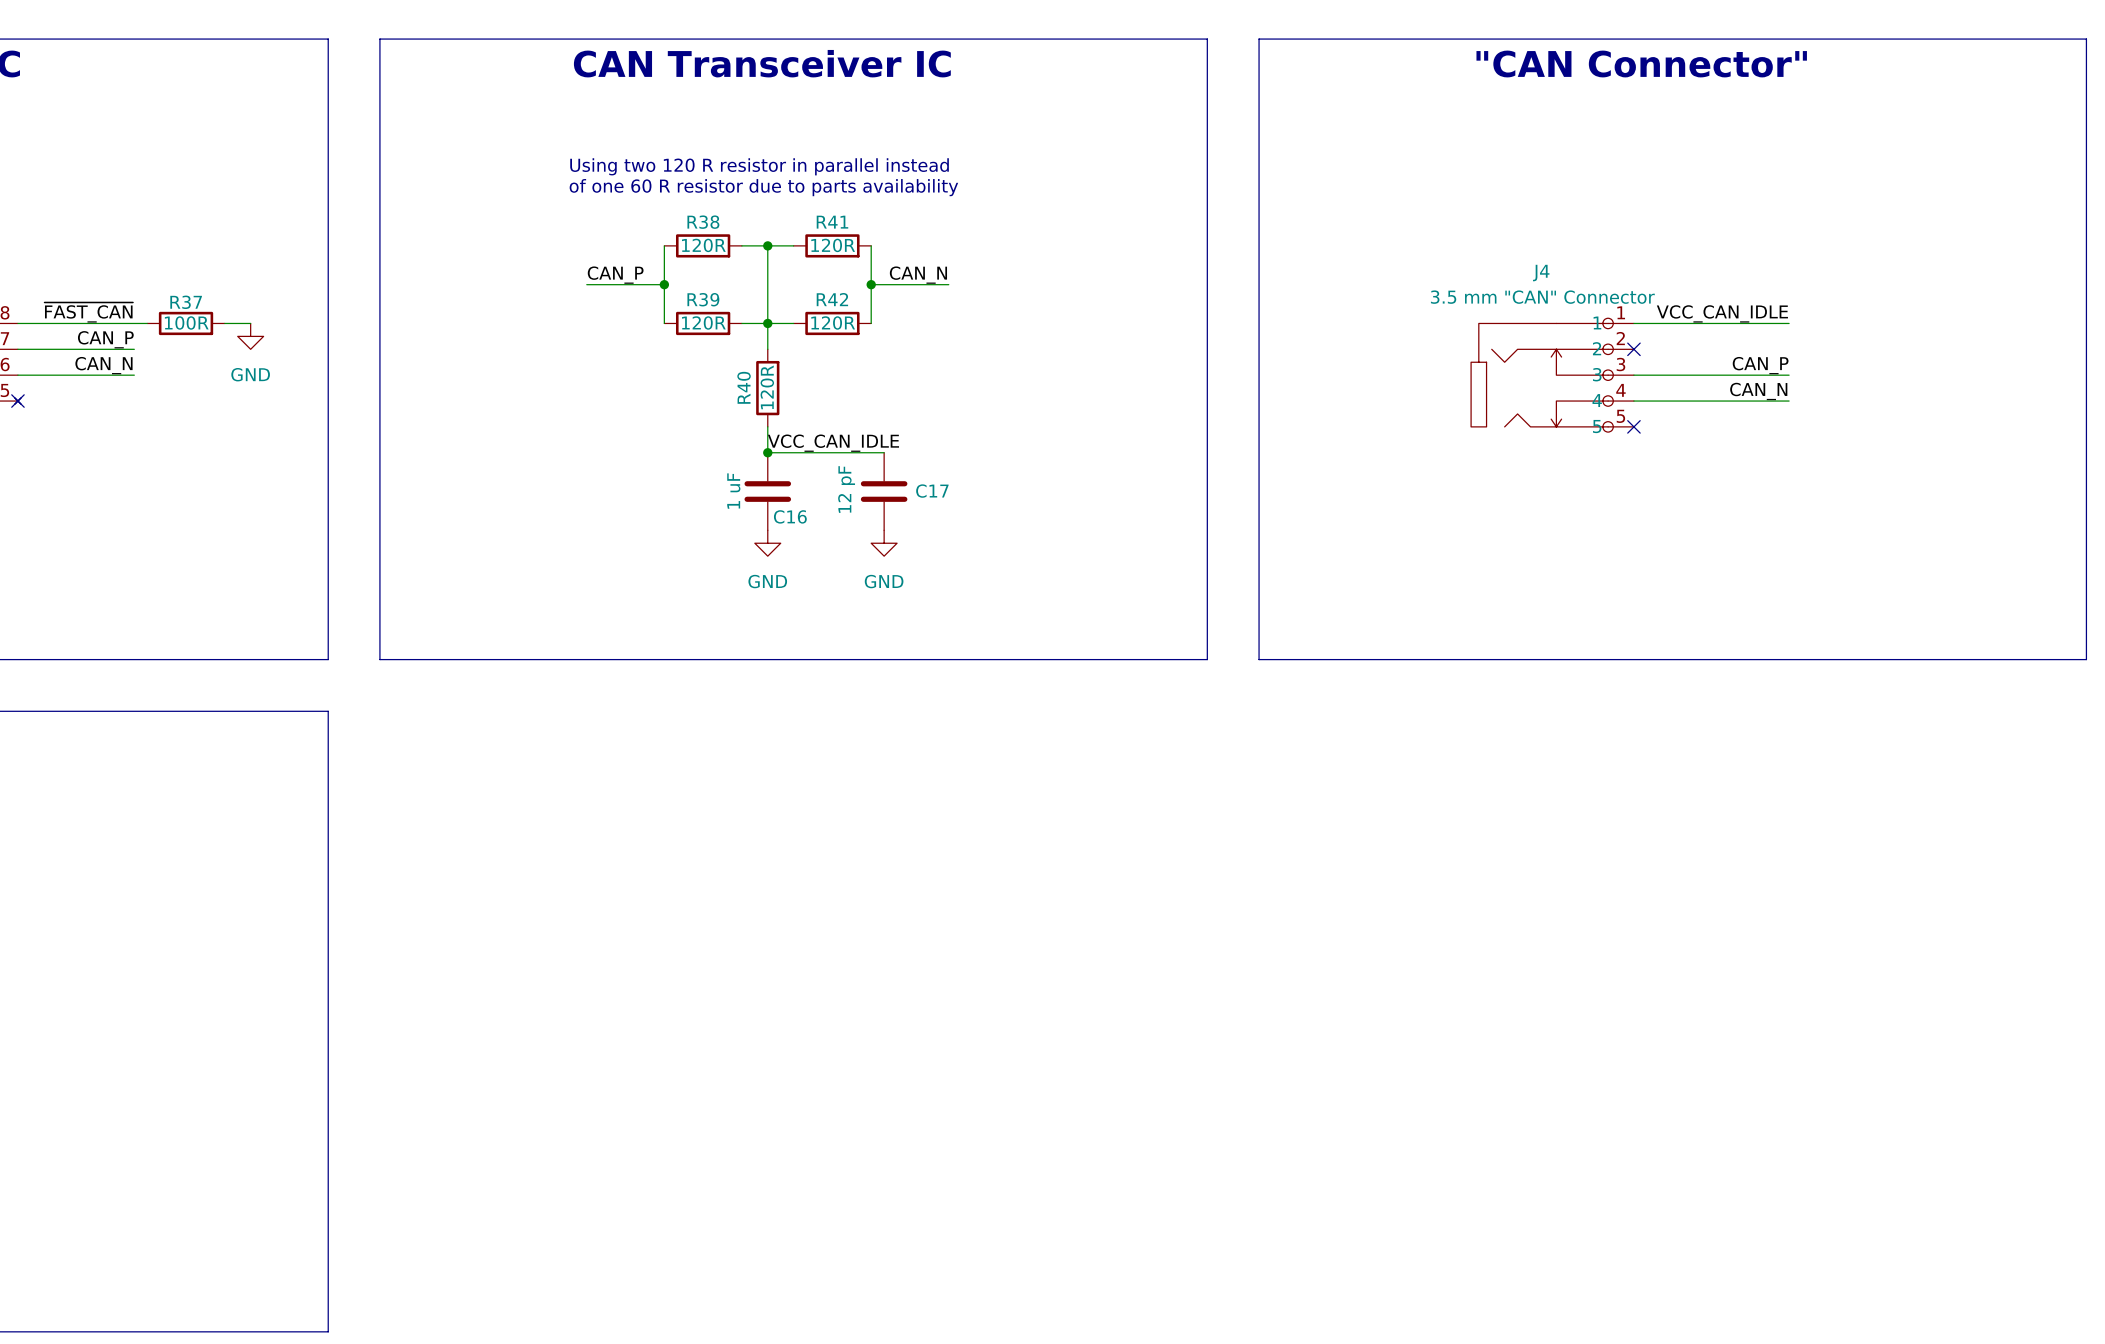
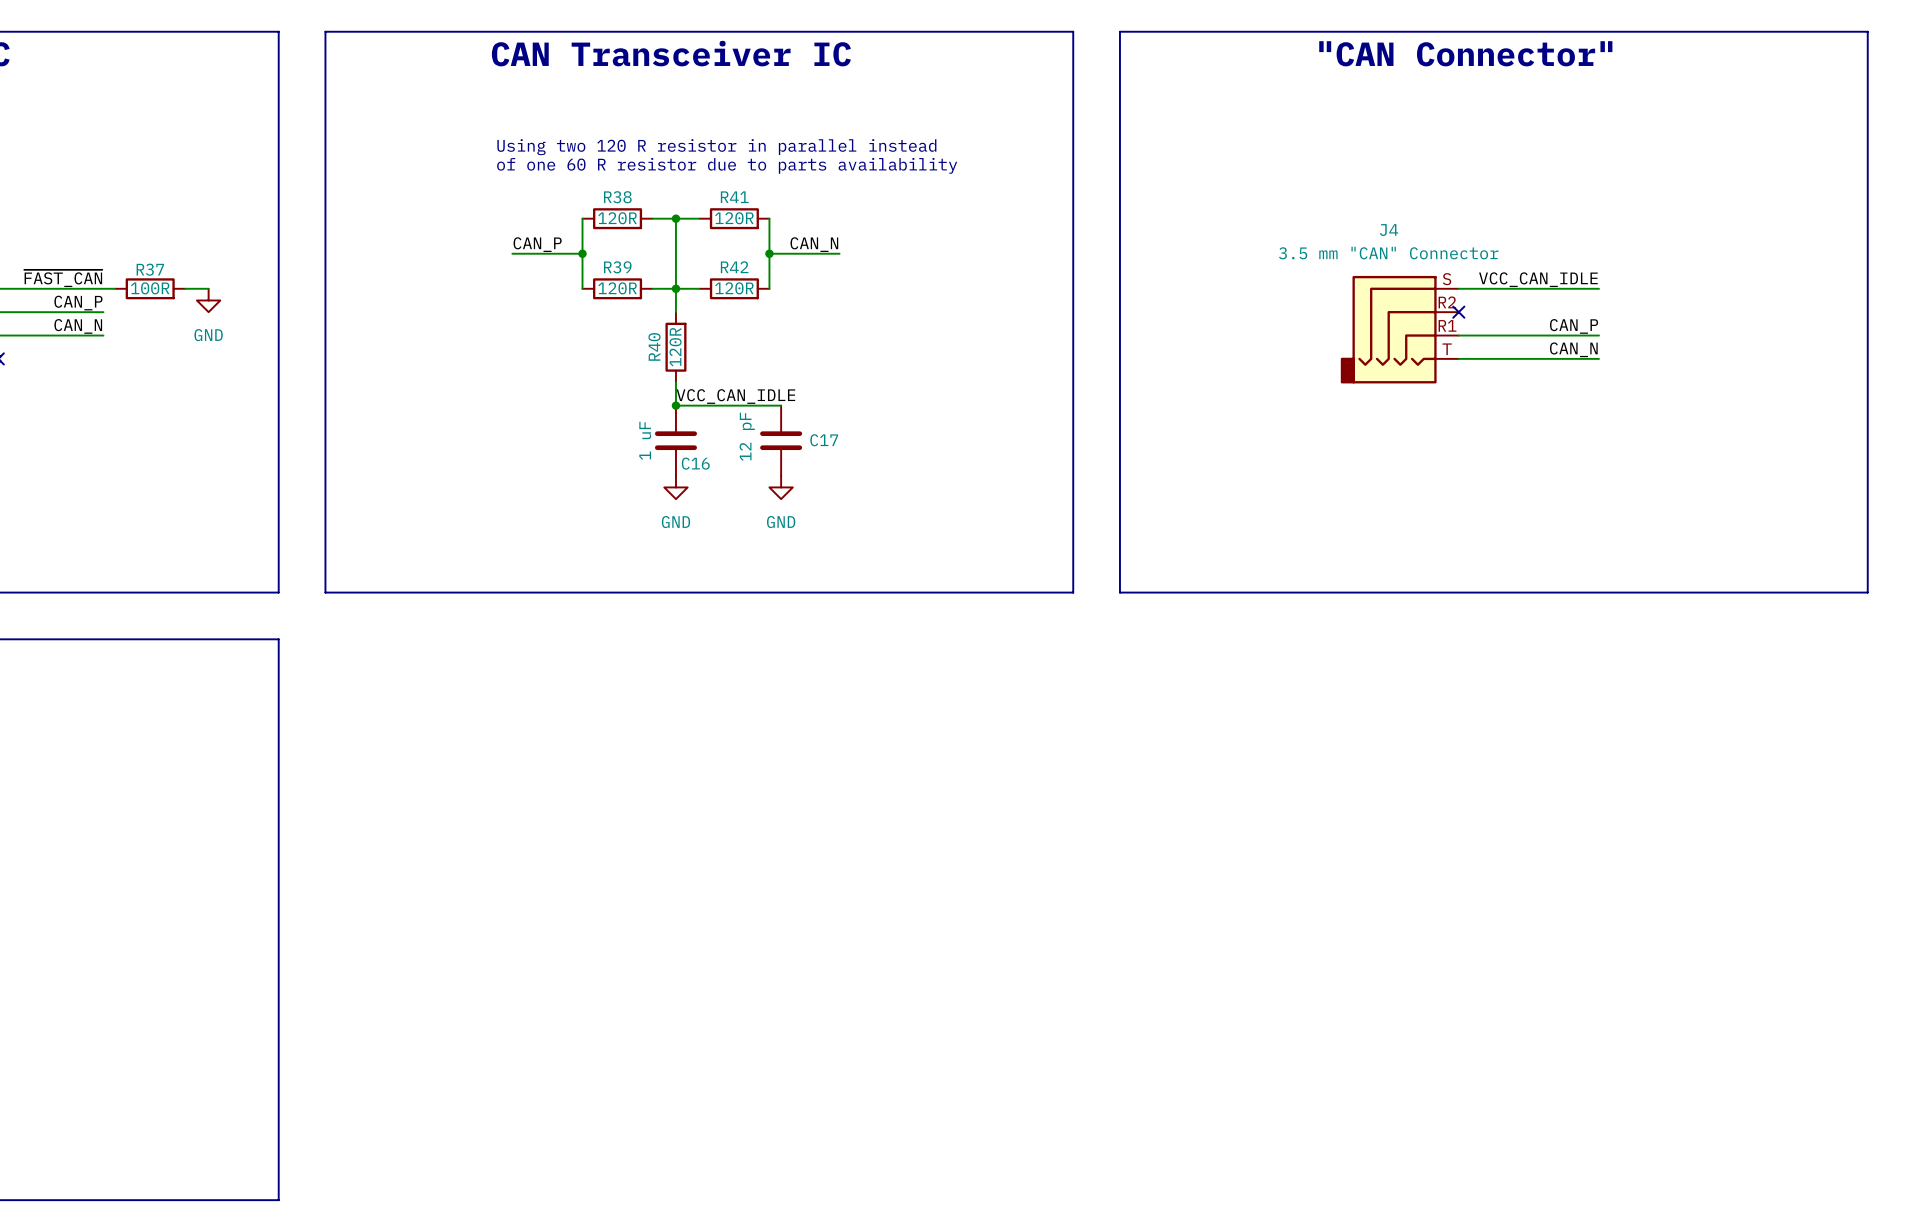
J4 symbol: [1471, 318, 1634, 433] -> [1340, 275, 1459, 384]
no-connect mark: (1633, 426) -> none

